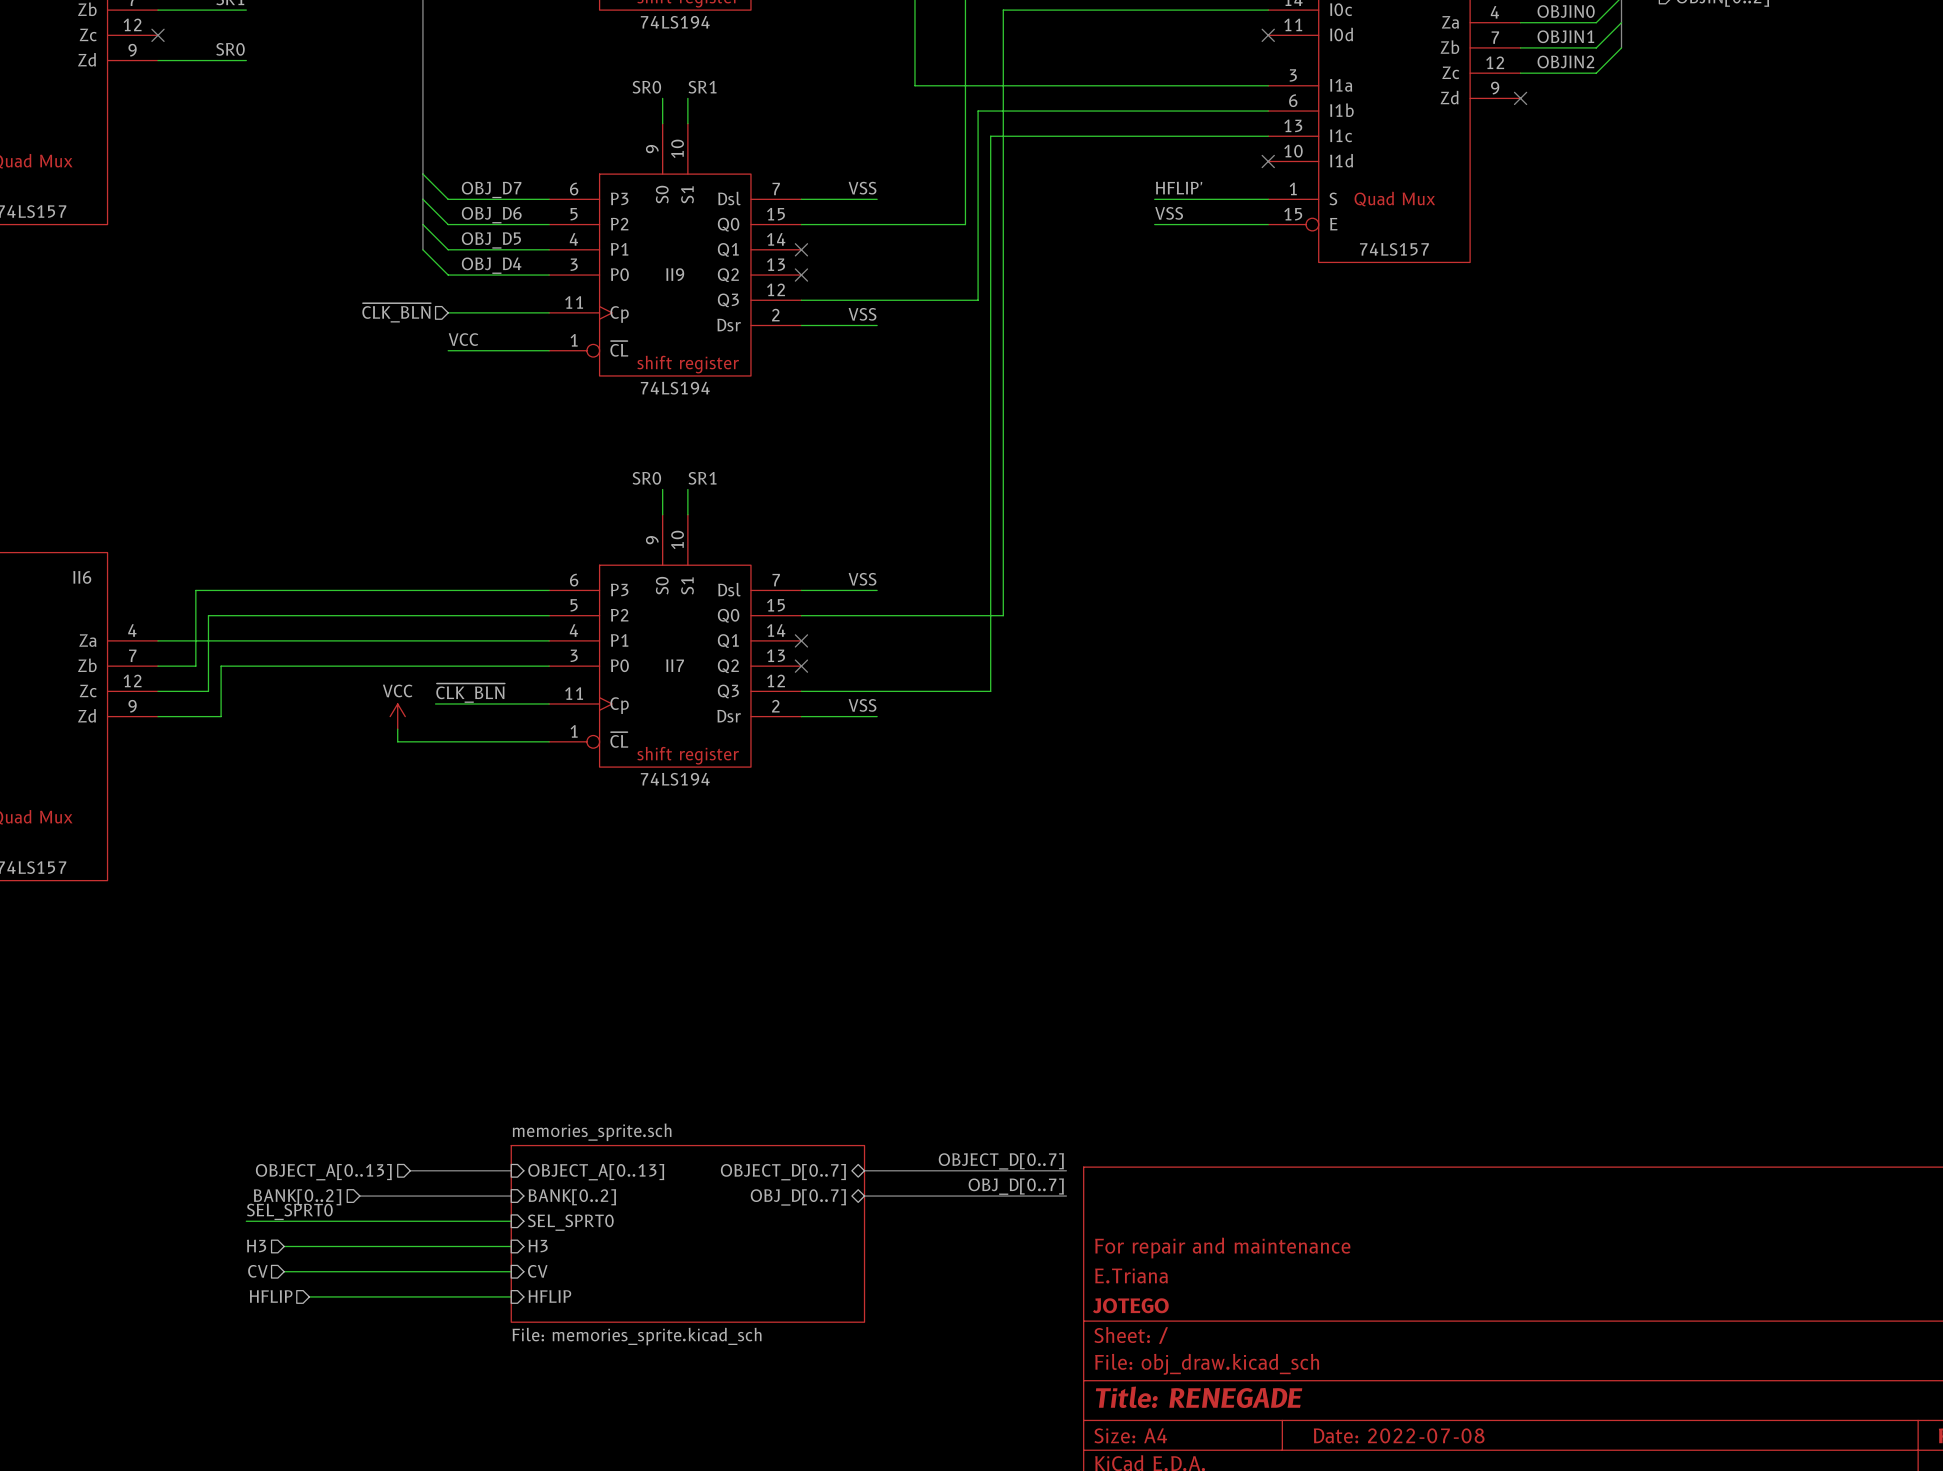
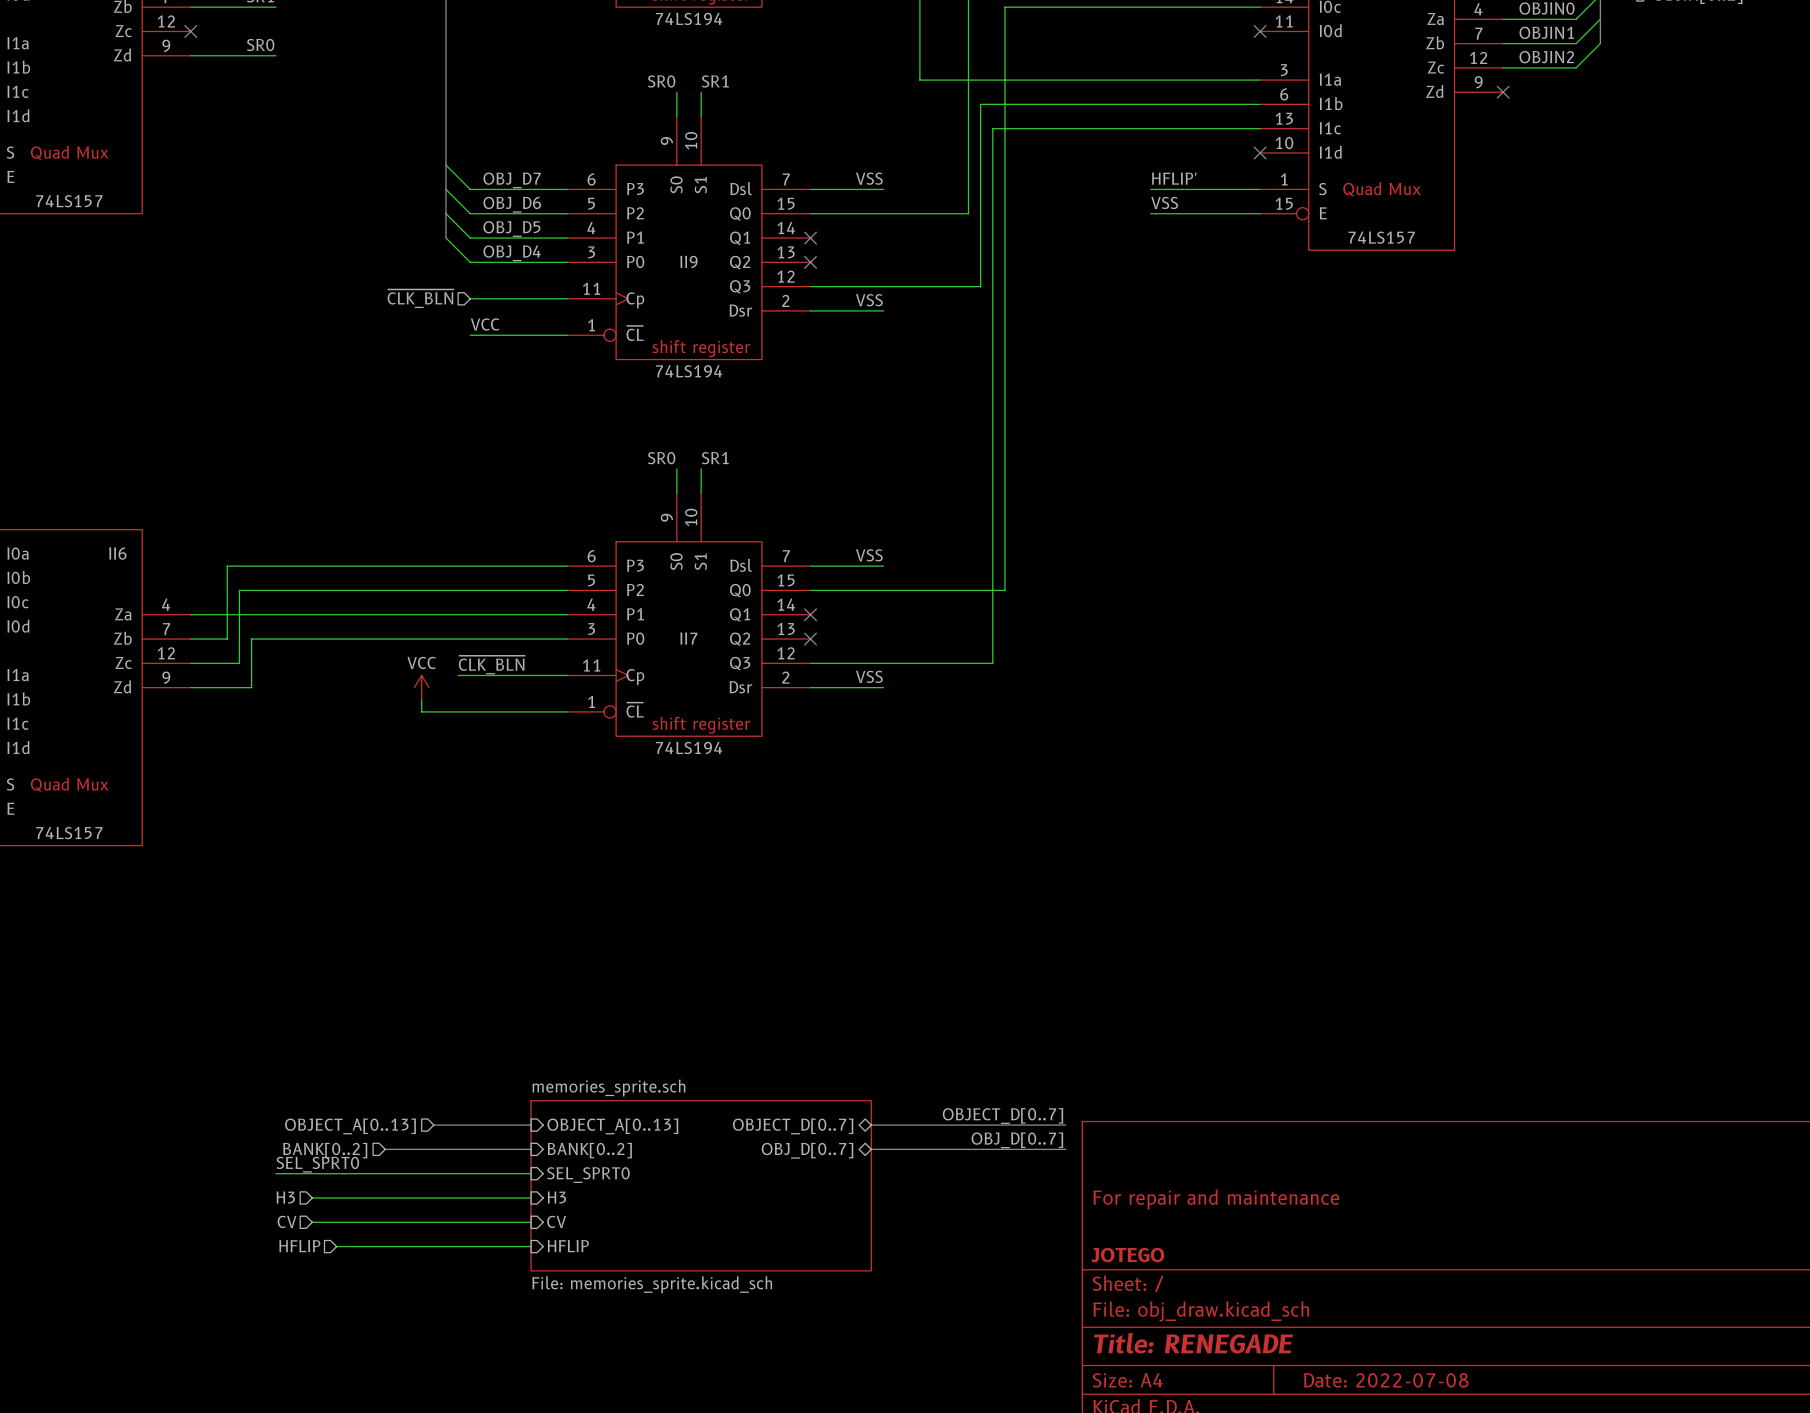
title block: E.Triana (1131, 1276) -> none

